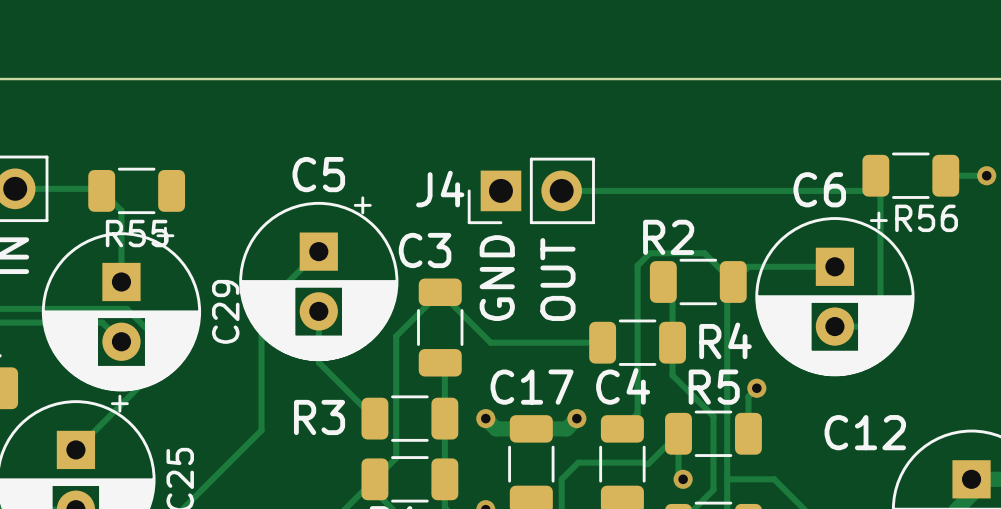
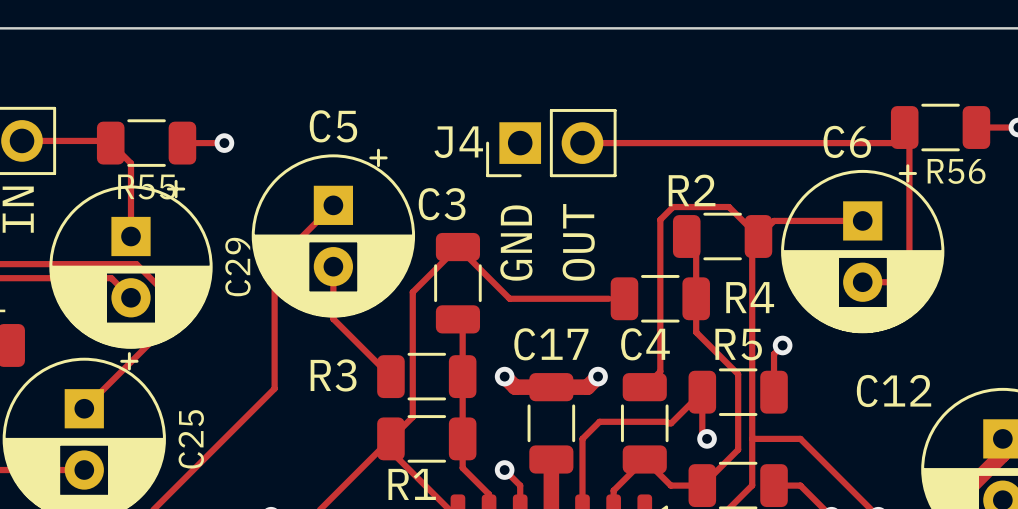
track: none -> (182, 143) (224, 143)
via: none -> (224, 143)

